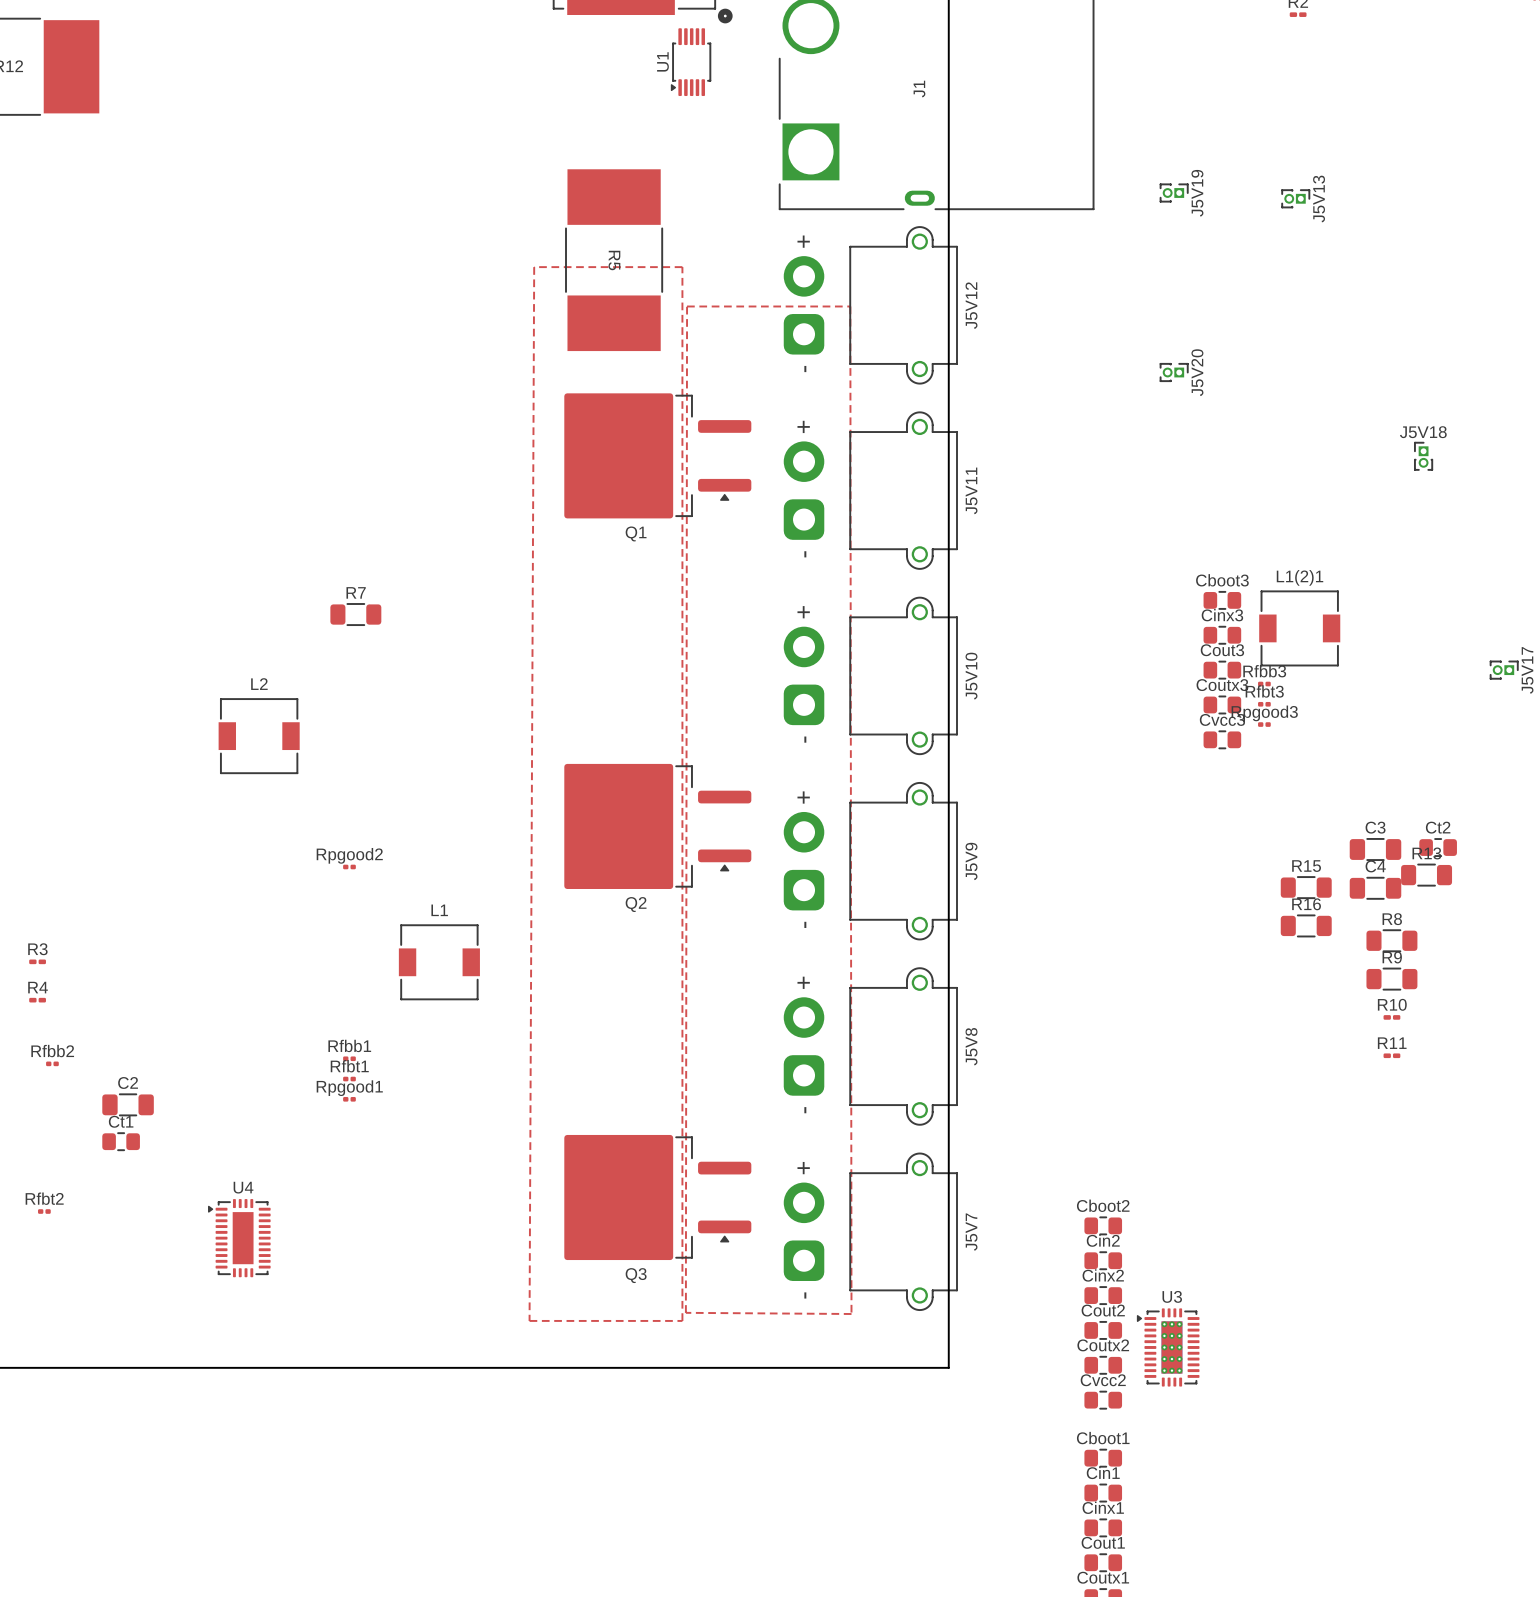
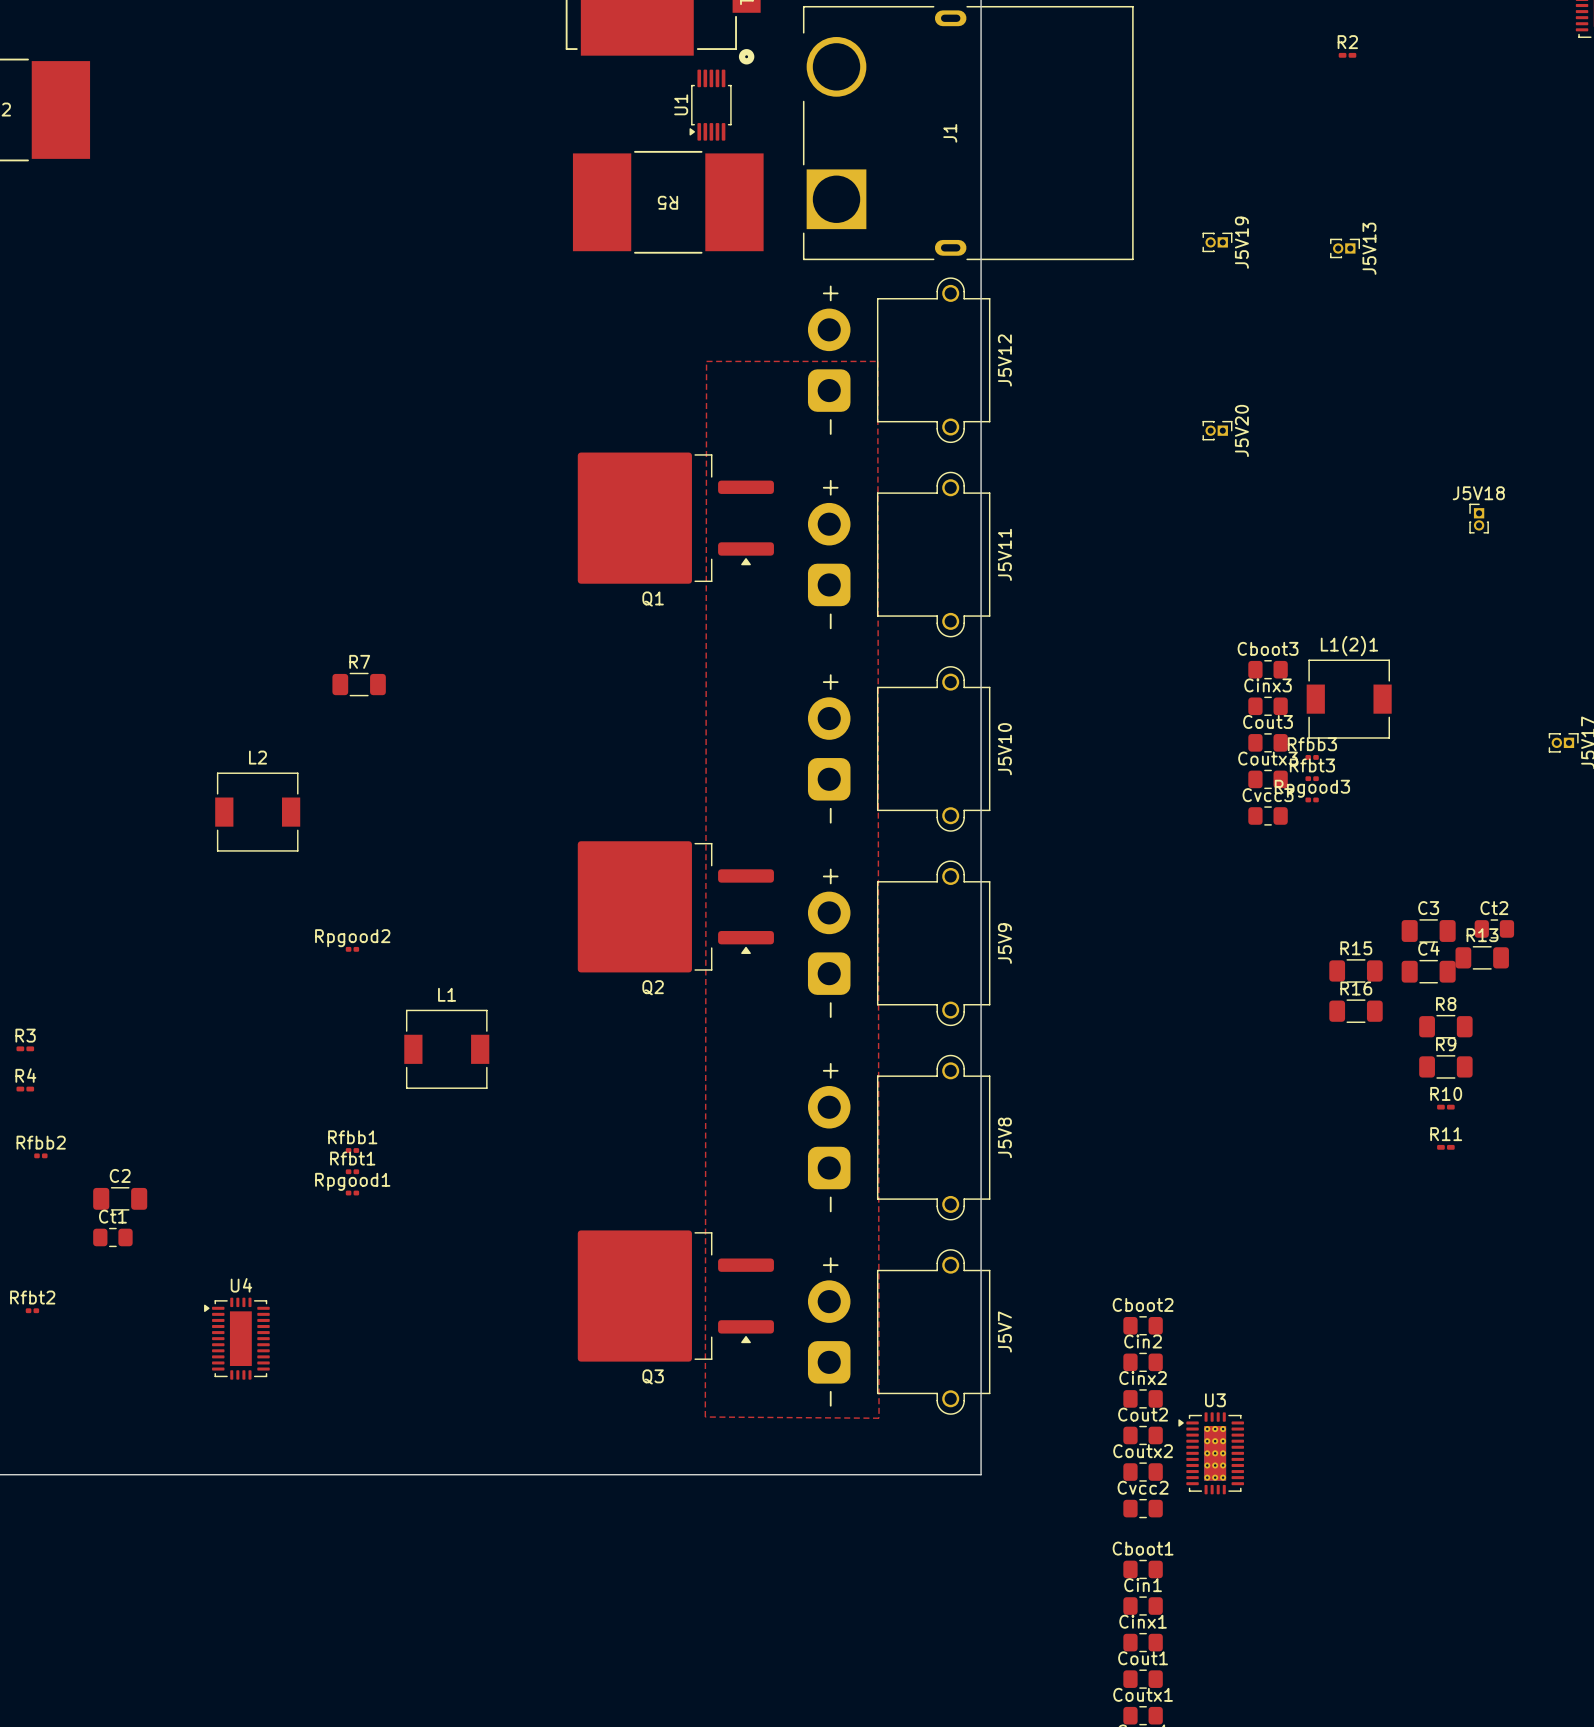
R5 rotation: 0° (614, 260) -> 90° clockwise (668, 202)
R5 position: (614, 260) -> (668, 202)
top zone outline: (534, 267) (529, 1320) (682, 1320) (682, 267) (534, 267) -> none

